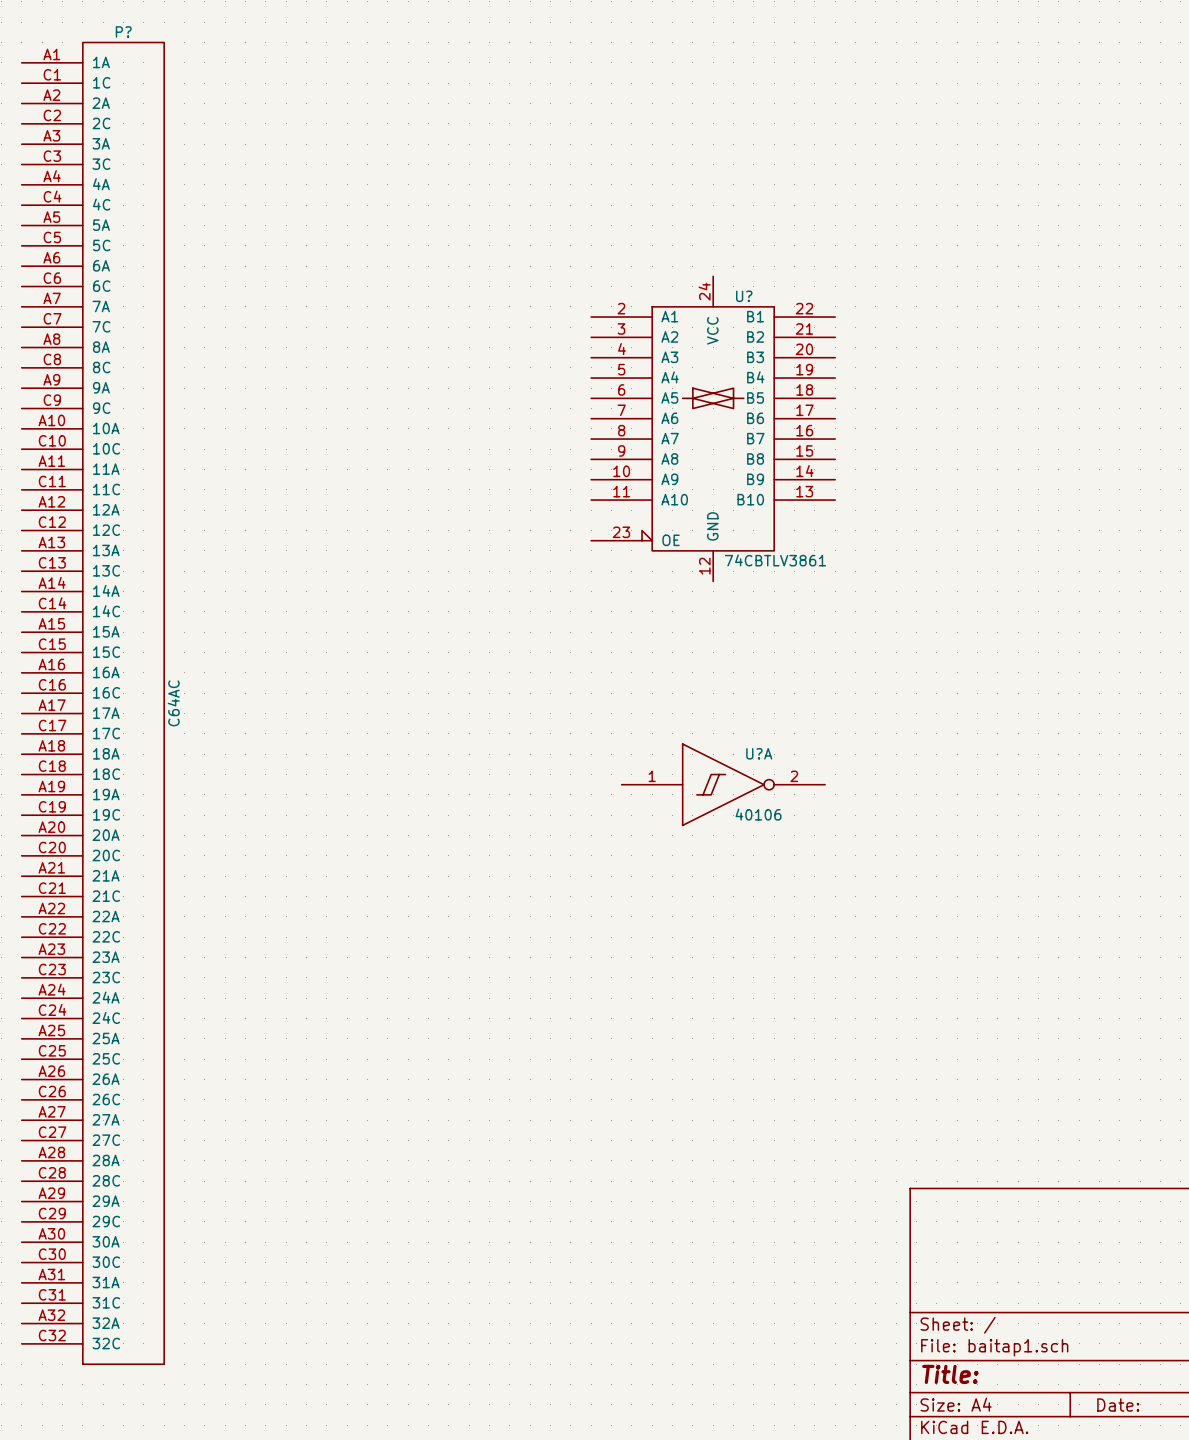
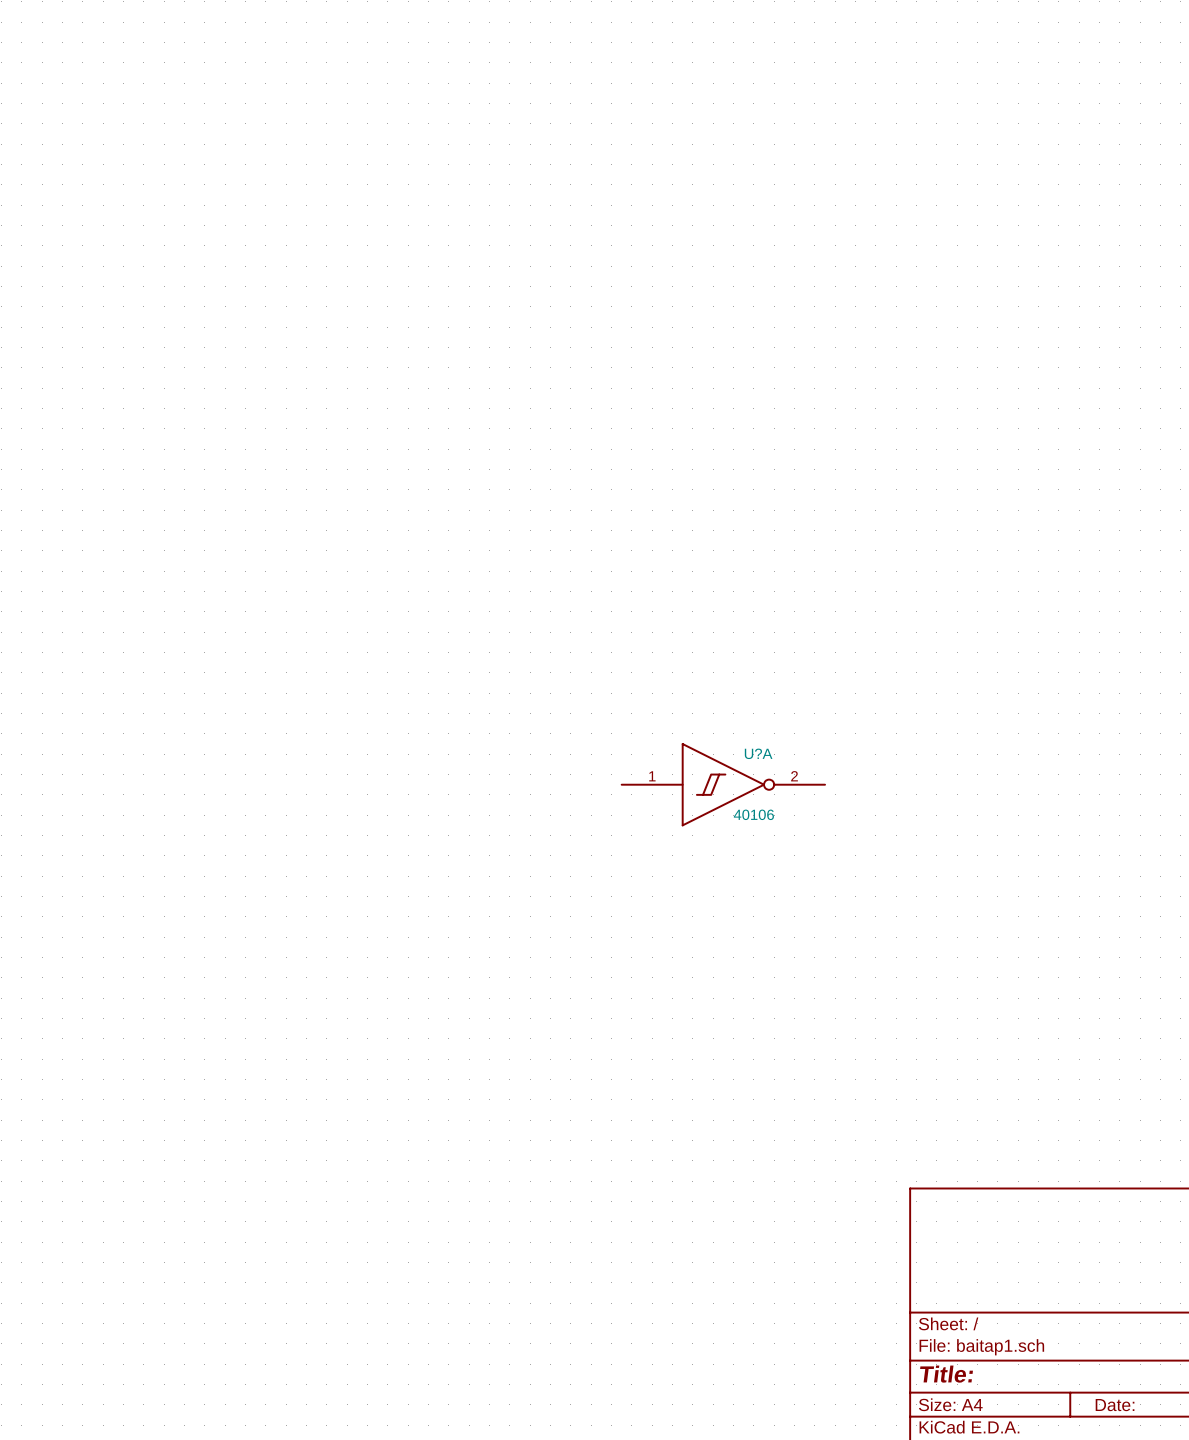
U?: 74CBTLV3861 (713, 428) -> none
P?: C64AC (92, 703) -> none

